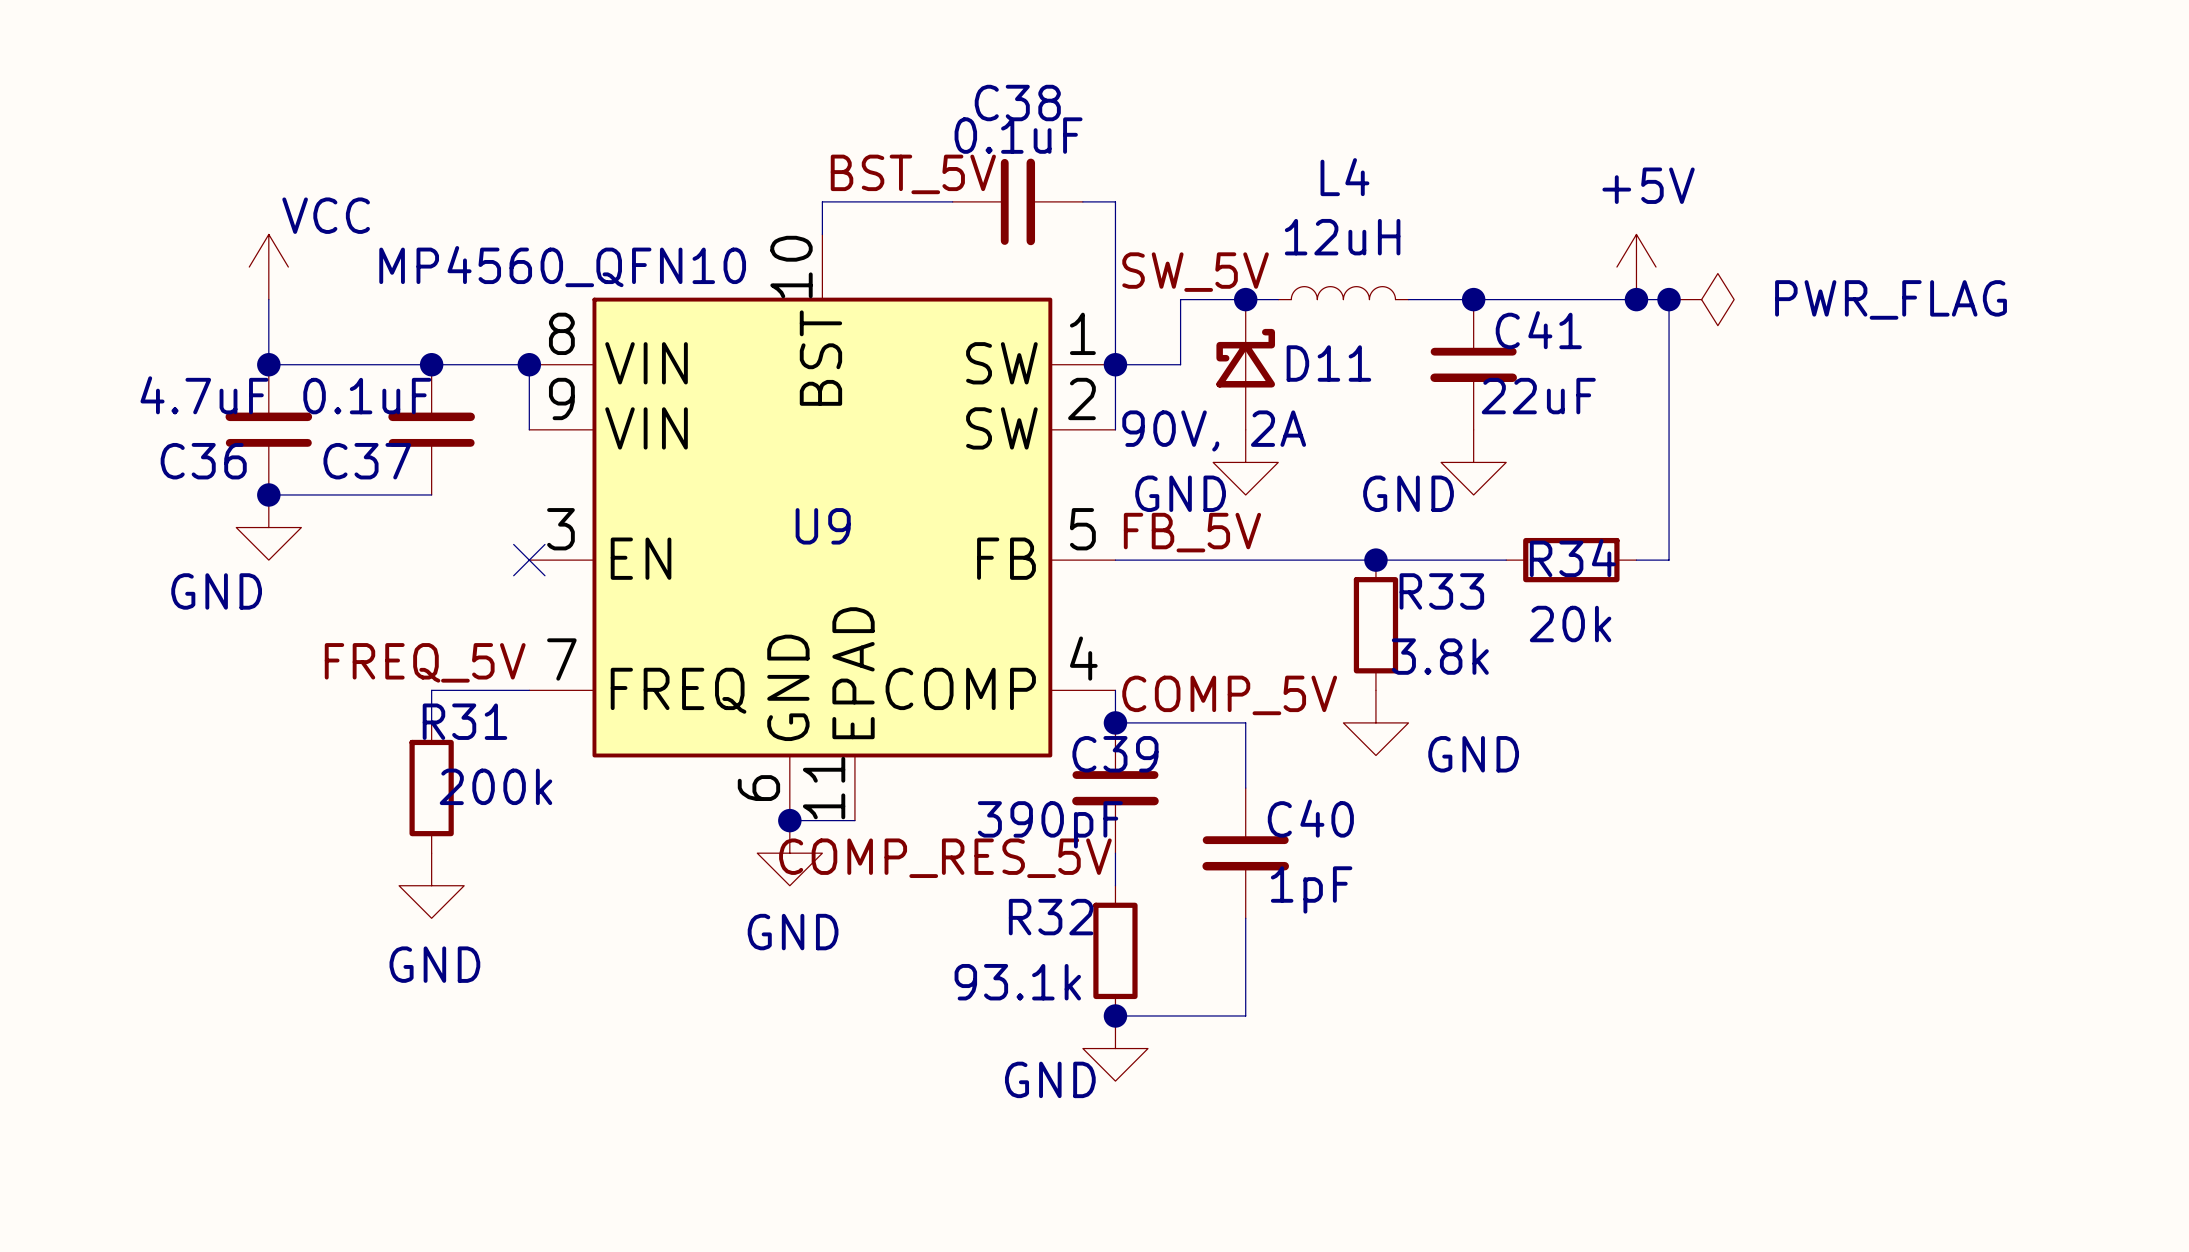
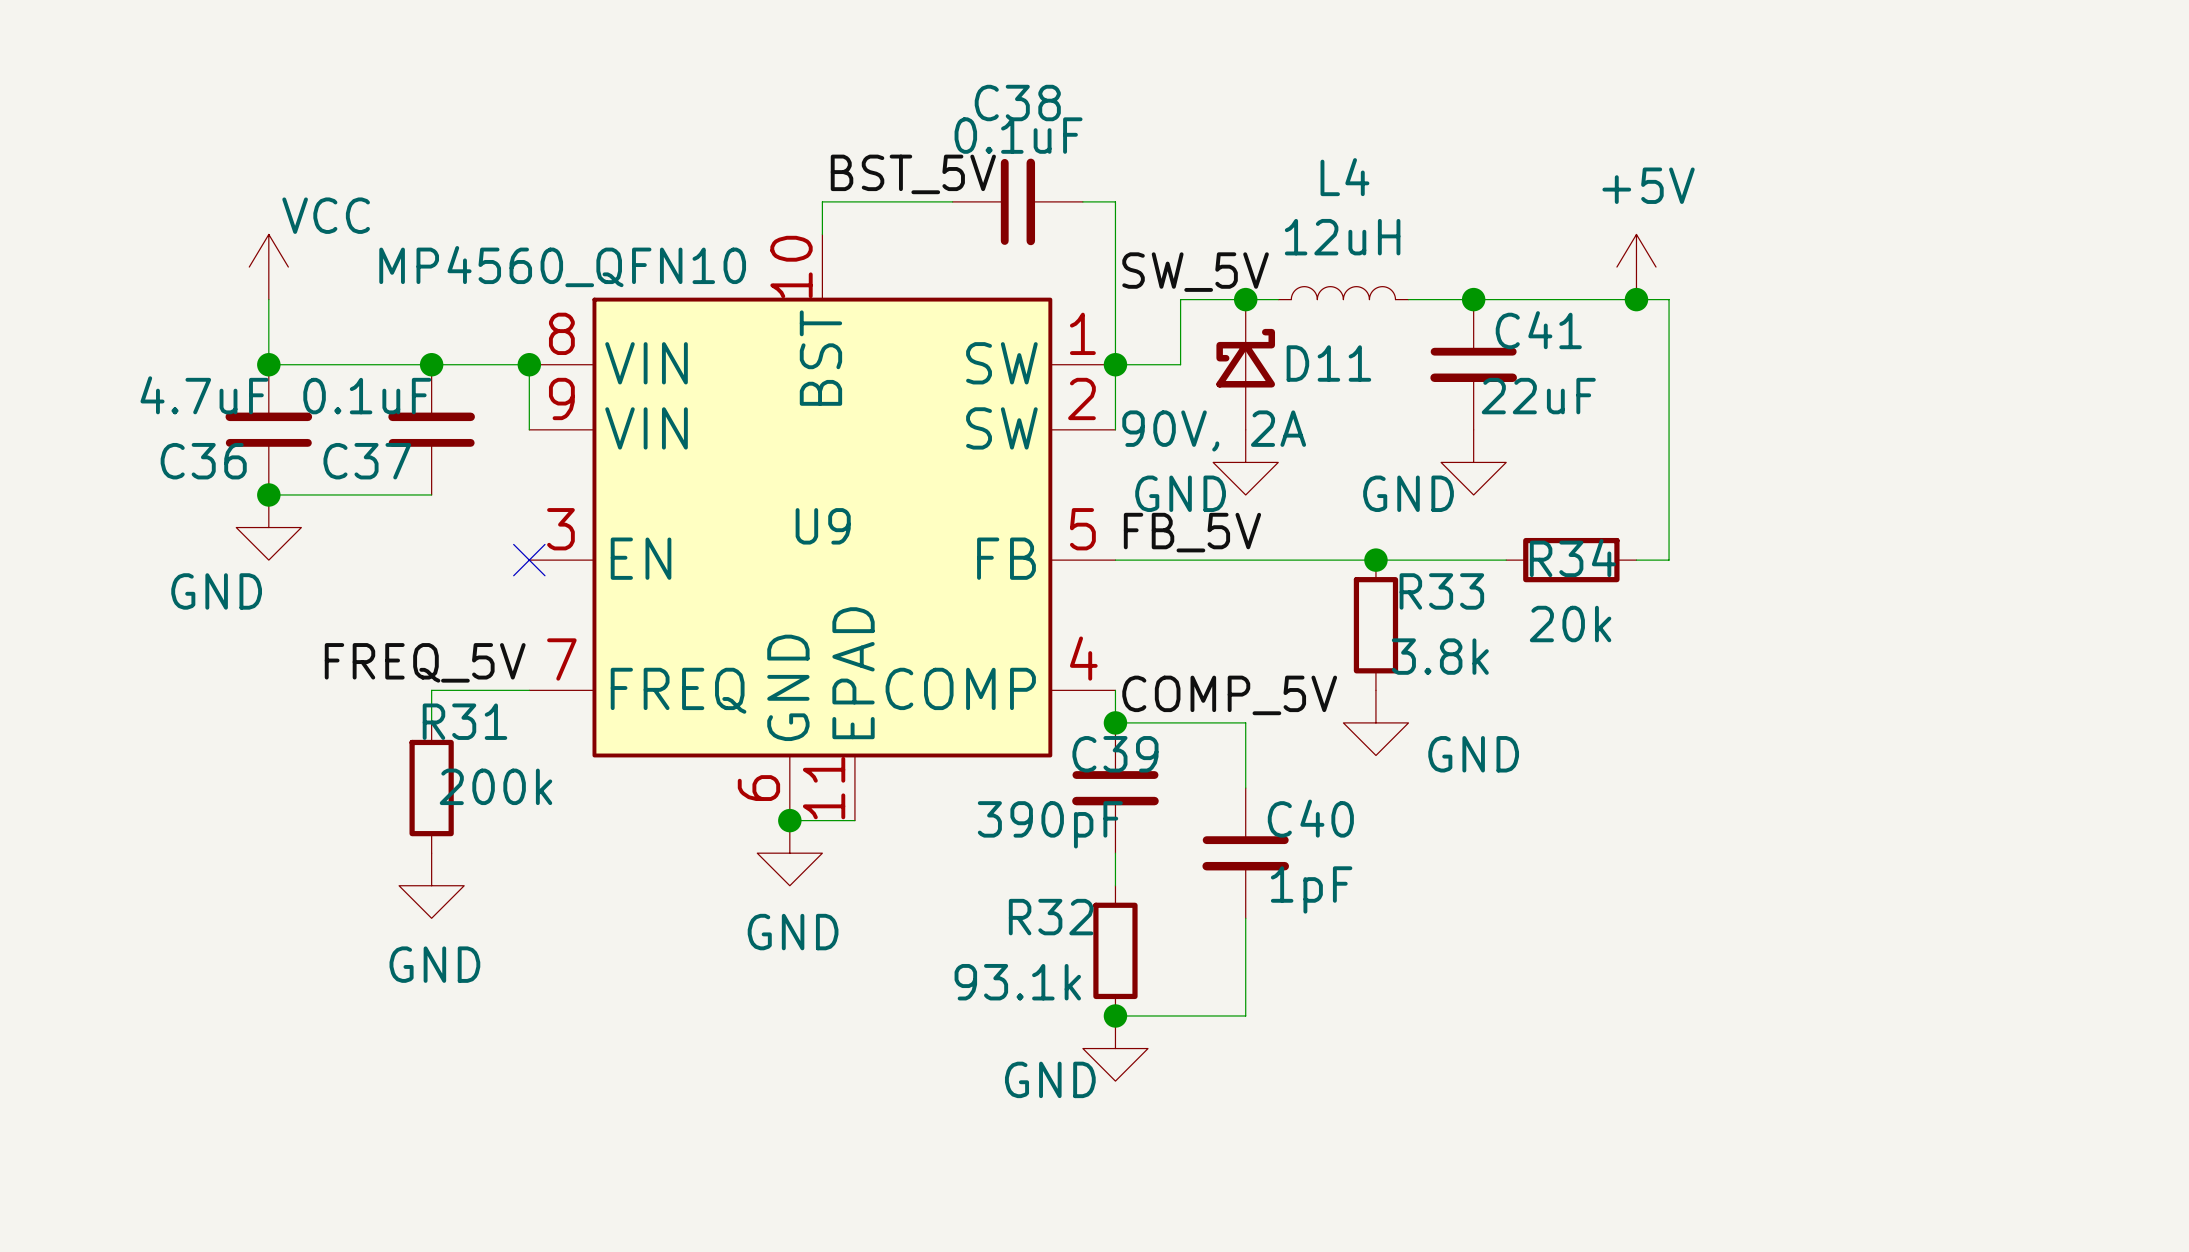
junction: (1669, 299) -> none
power symbol: PWR_FLAG (1701, 299) -> none
label: COMP_RES_5V (945, 858) -> none

